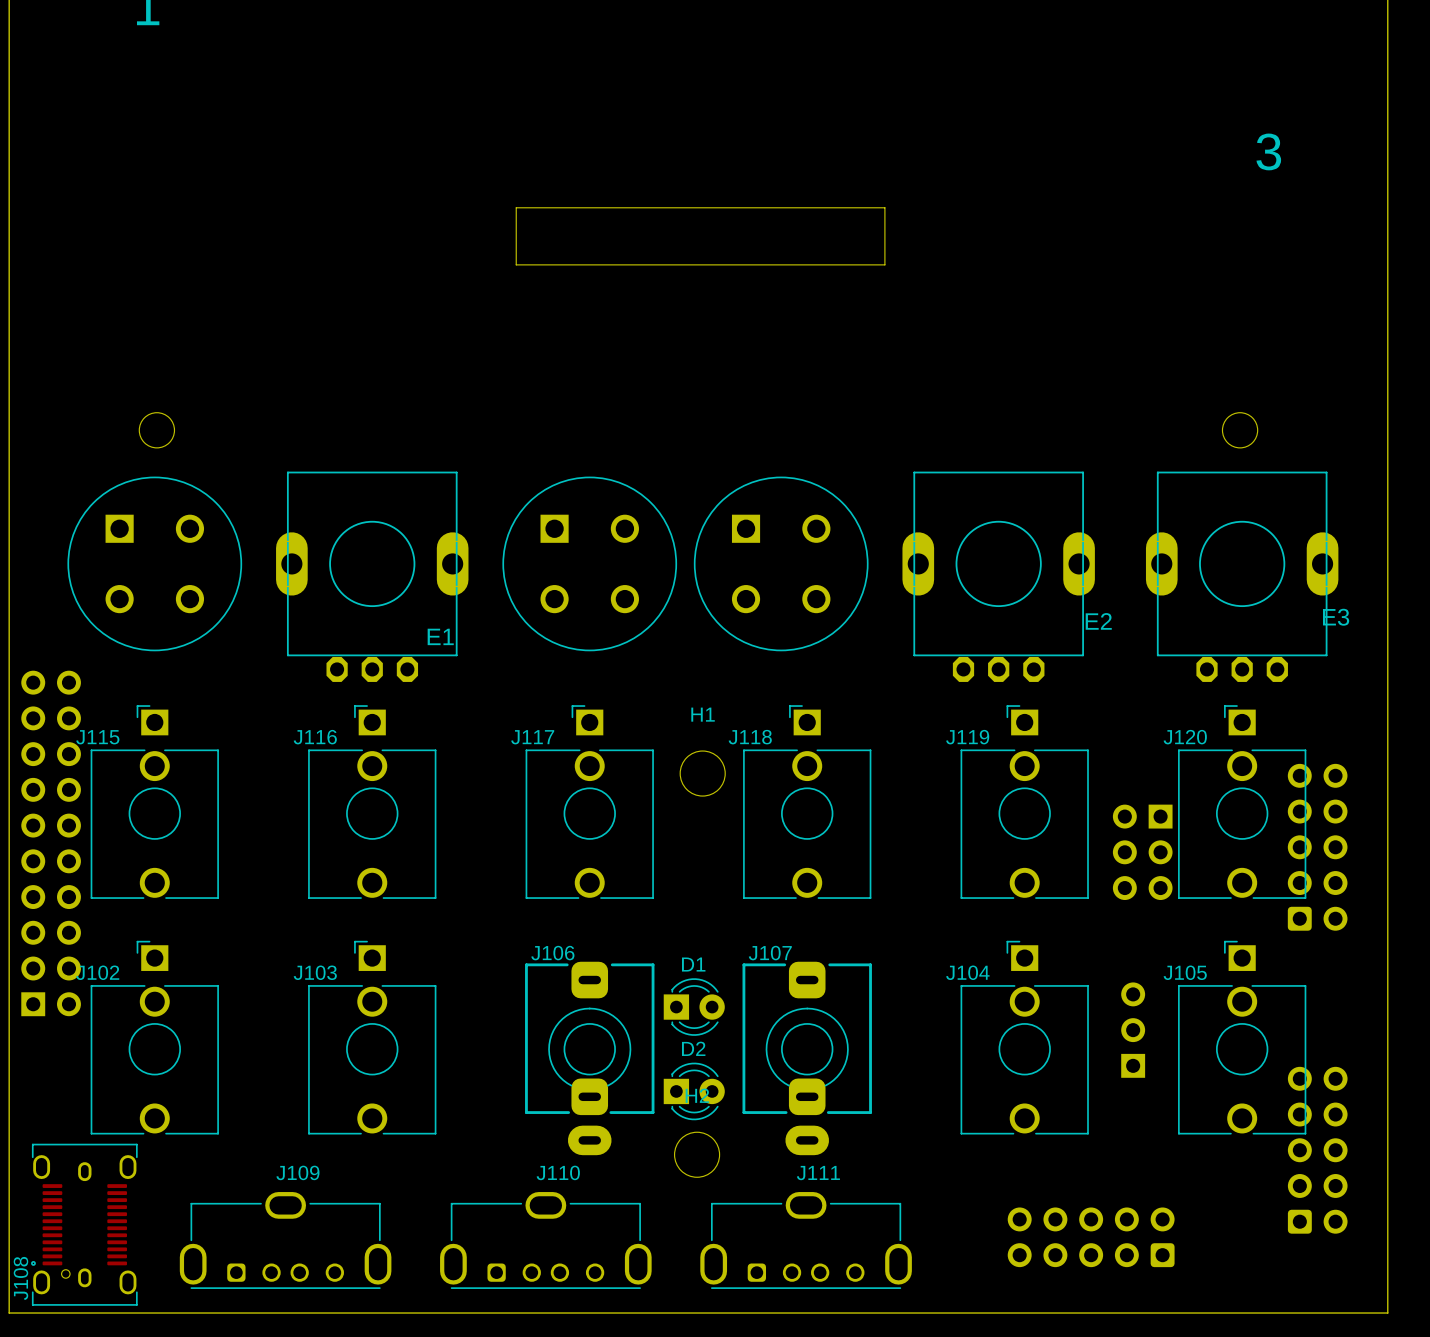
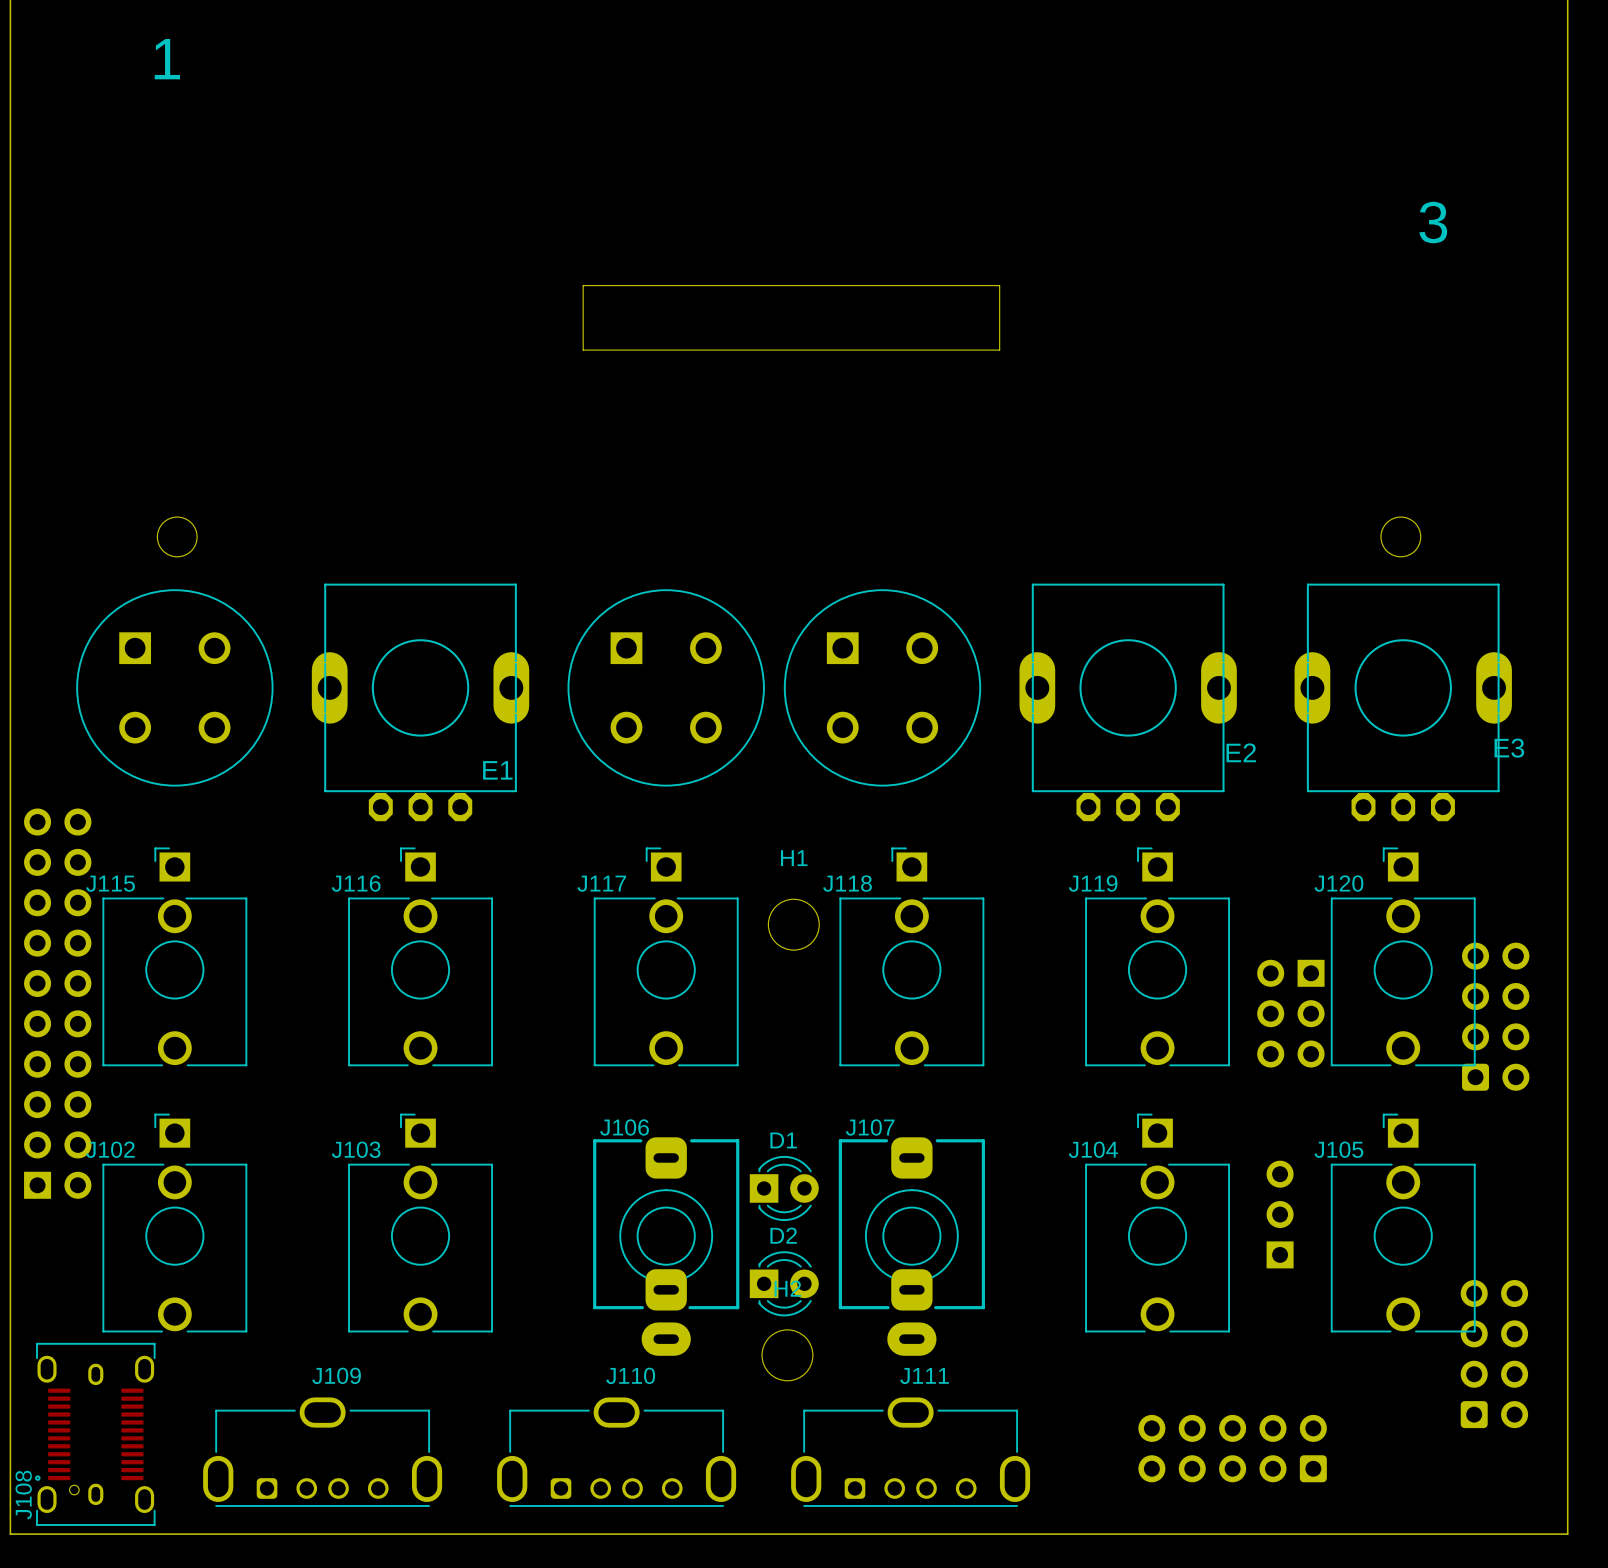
part footprint: [1287, 763, 1348, 931] -> [1462, 942, 1530, 1091]
part footprint: [1287, 1066, 1348, 1234] -> [1460, 1280, 1529, 1429]

